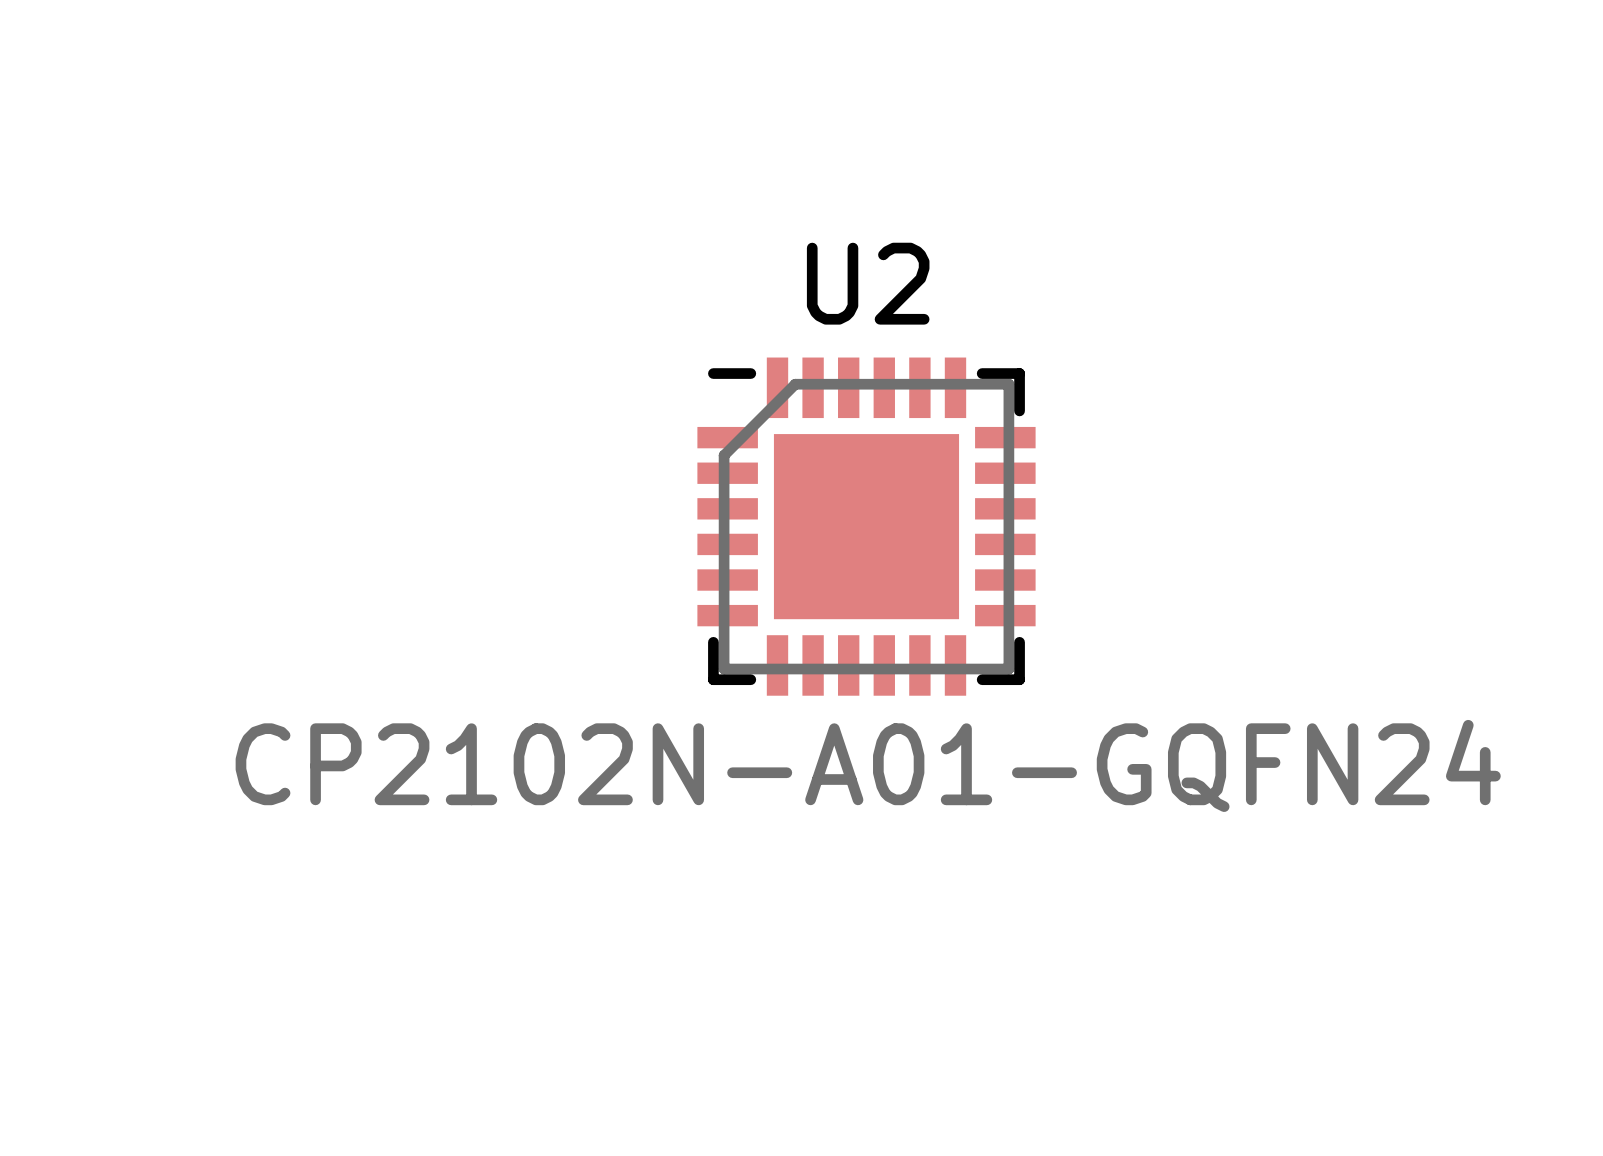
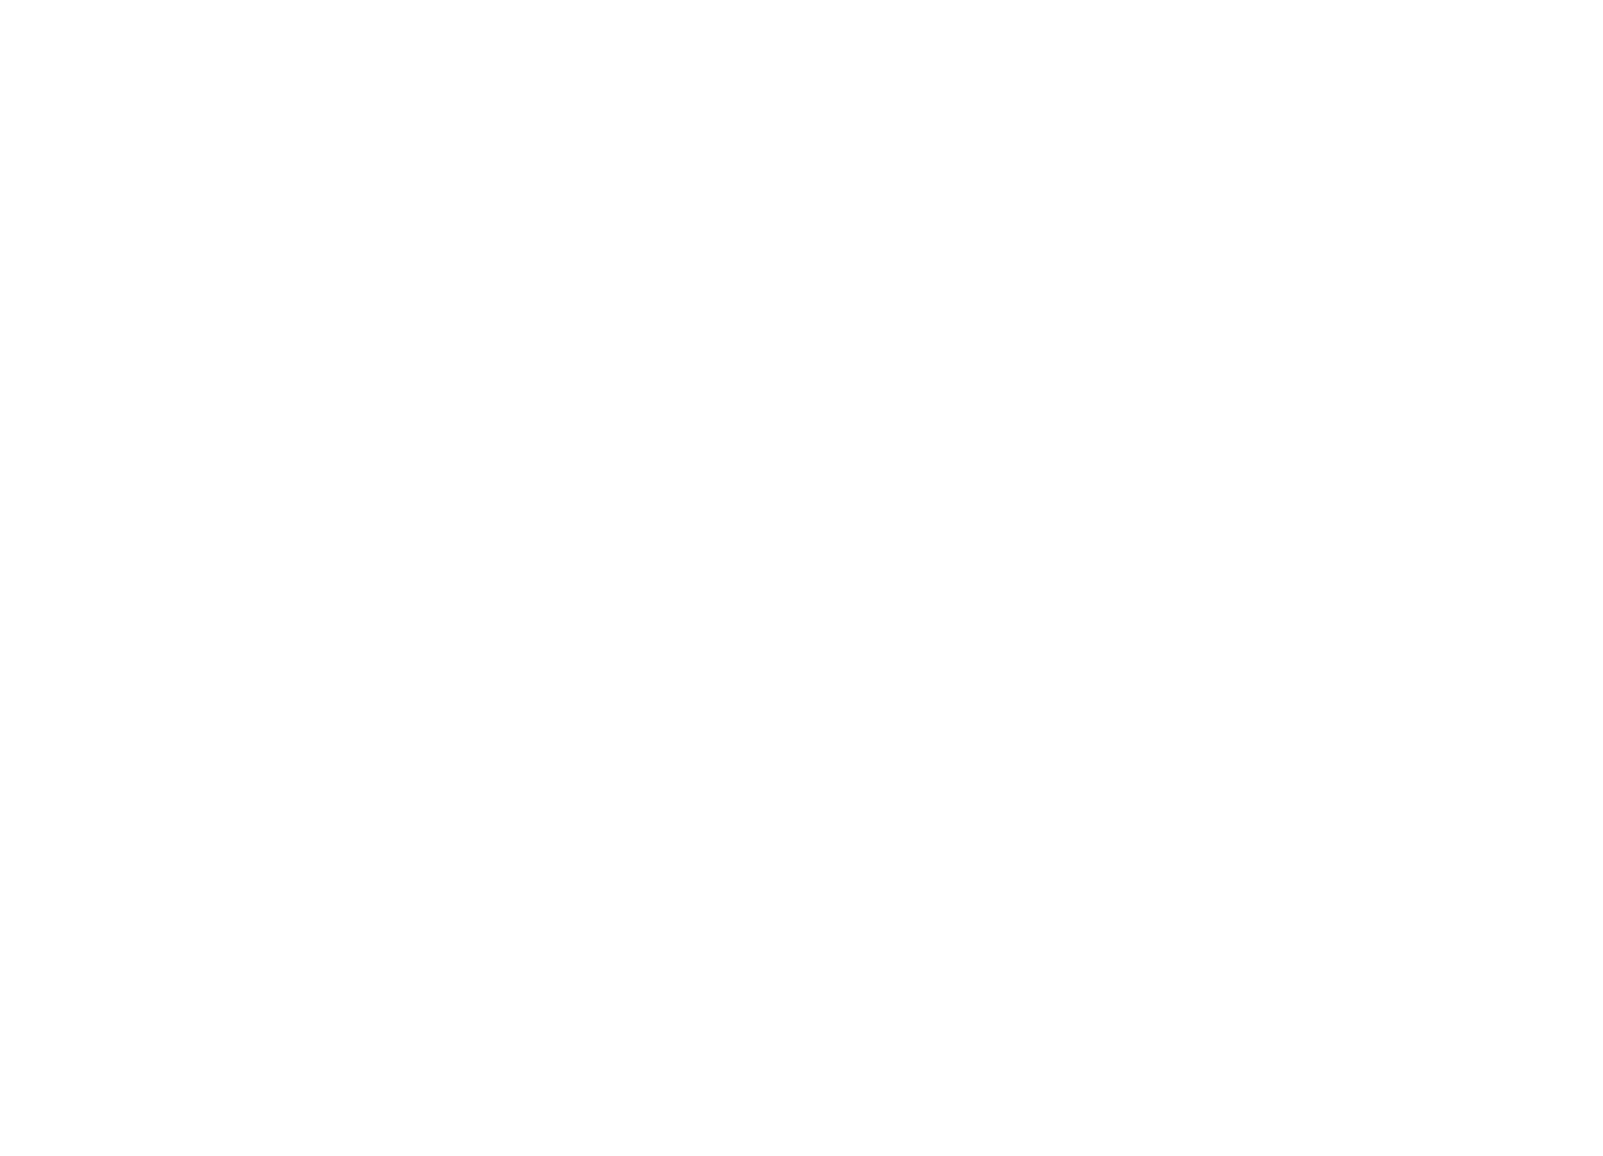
U2: CP2102N-A01-GQFN24 (866, 526) -> none

